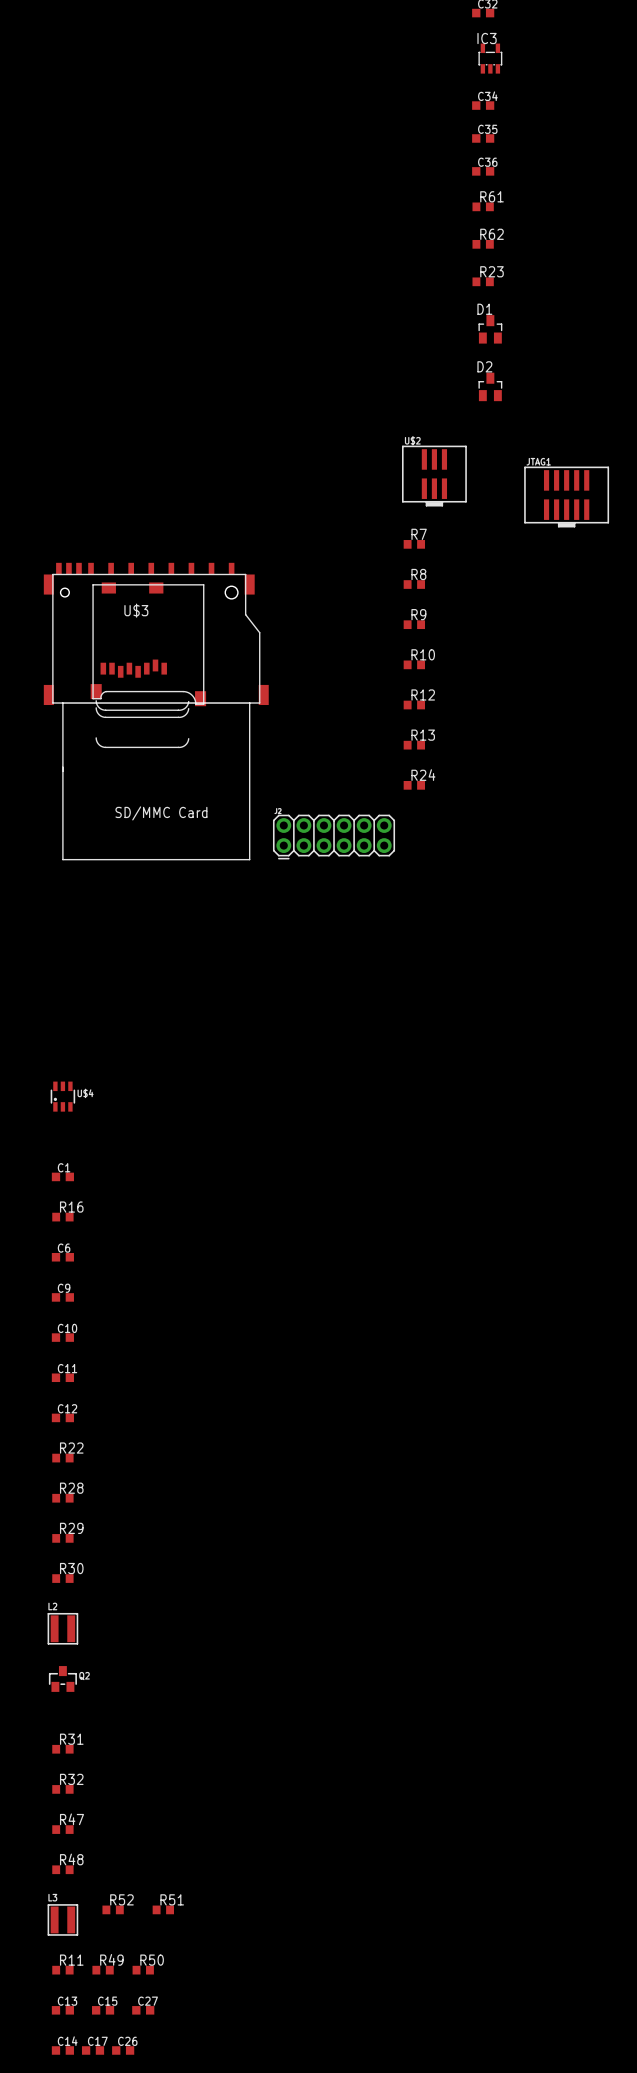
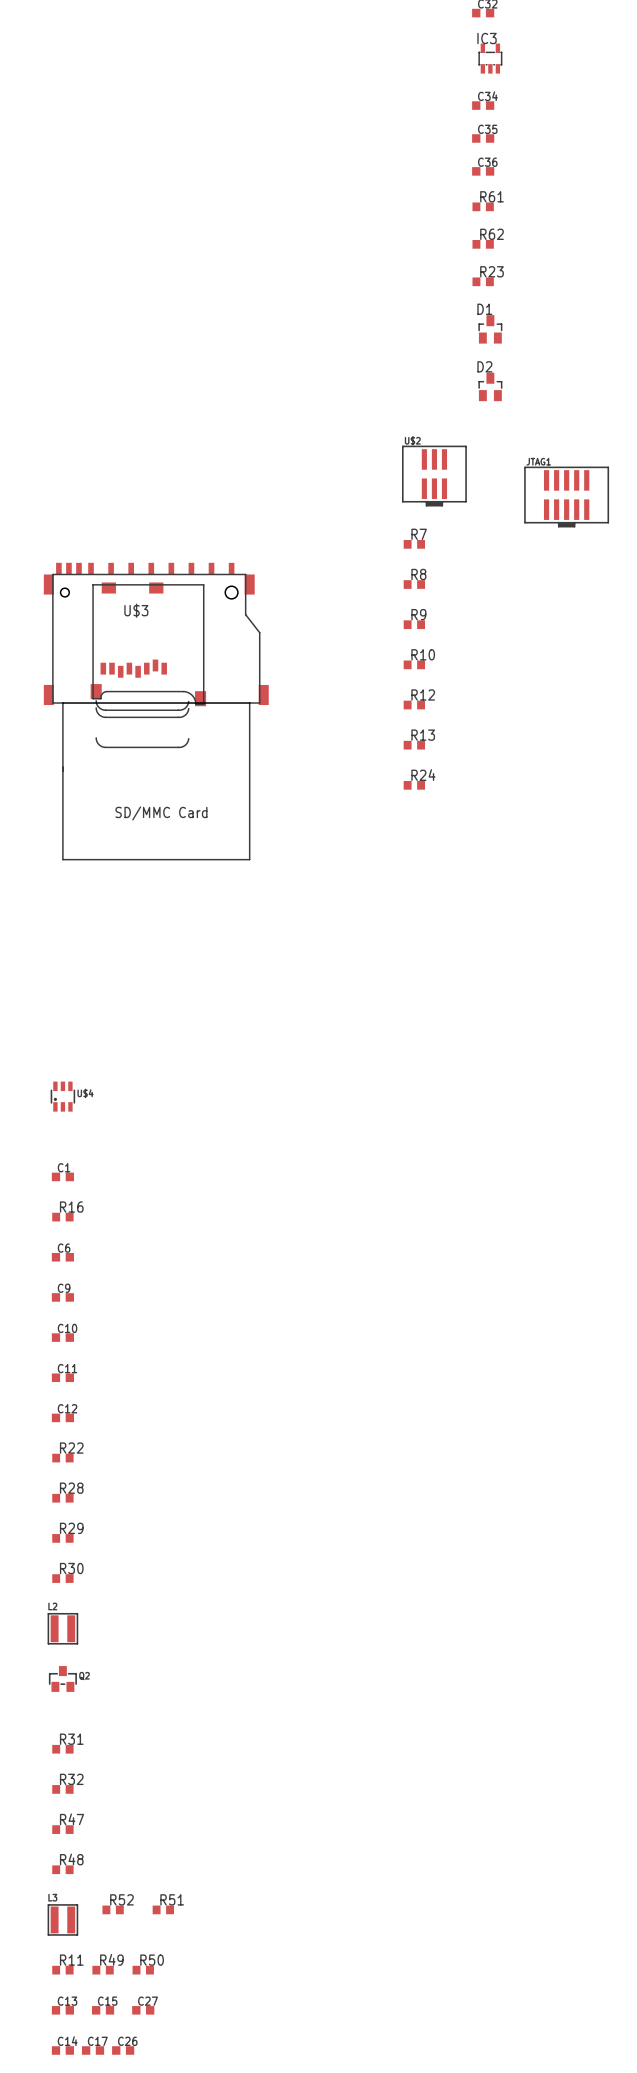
part: (334, 837) -> none

